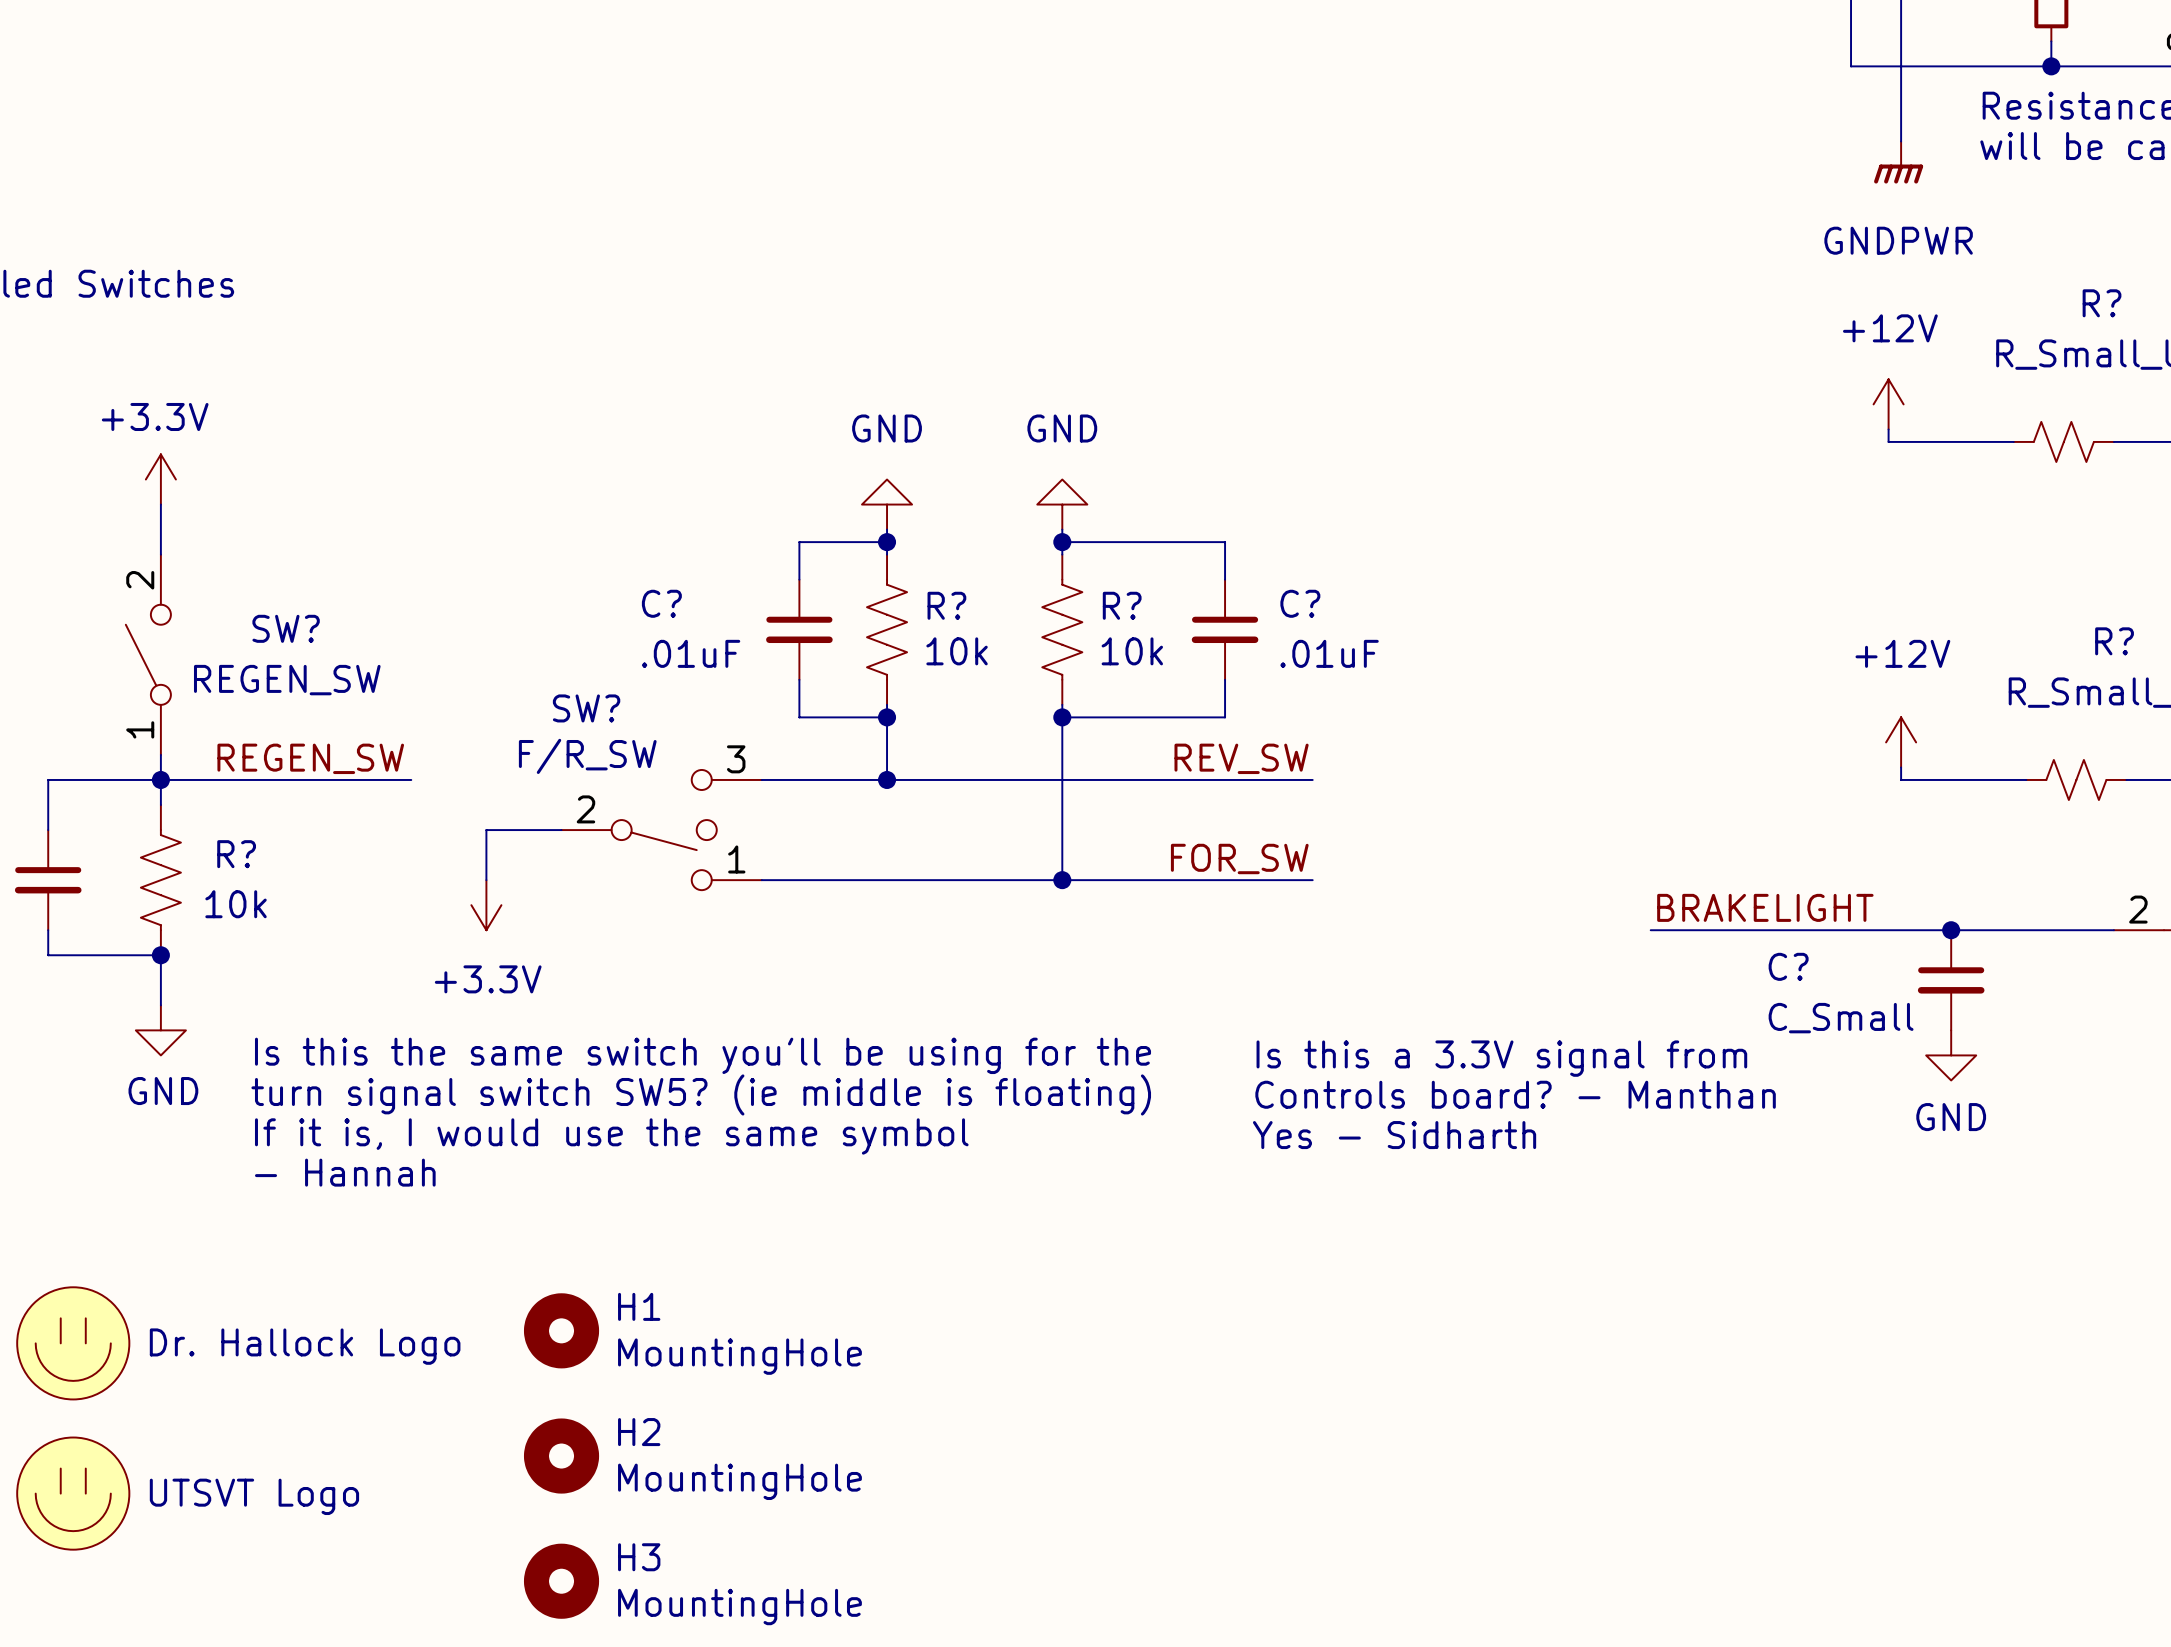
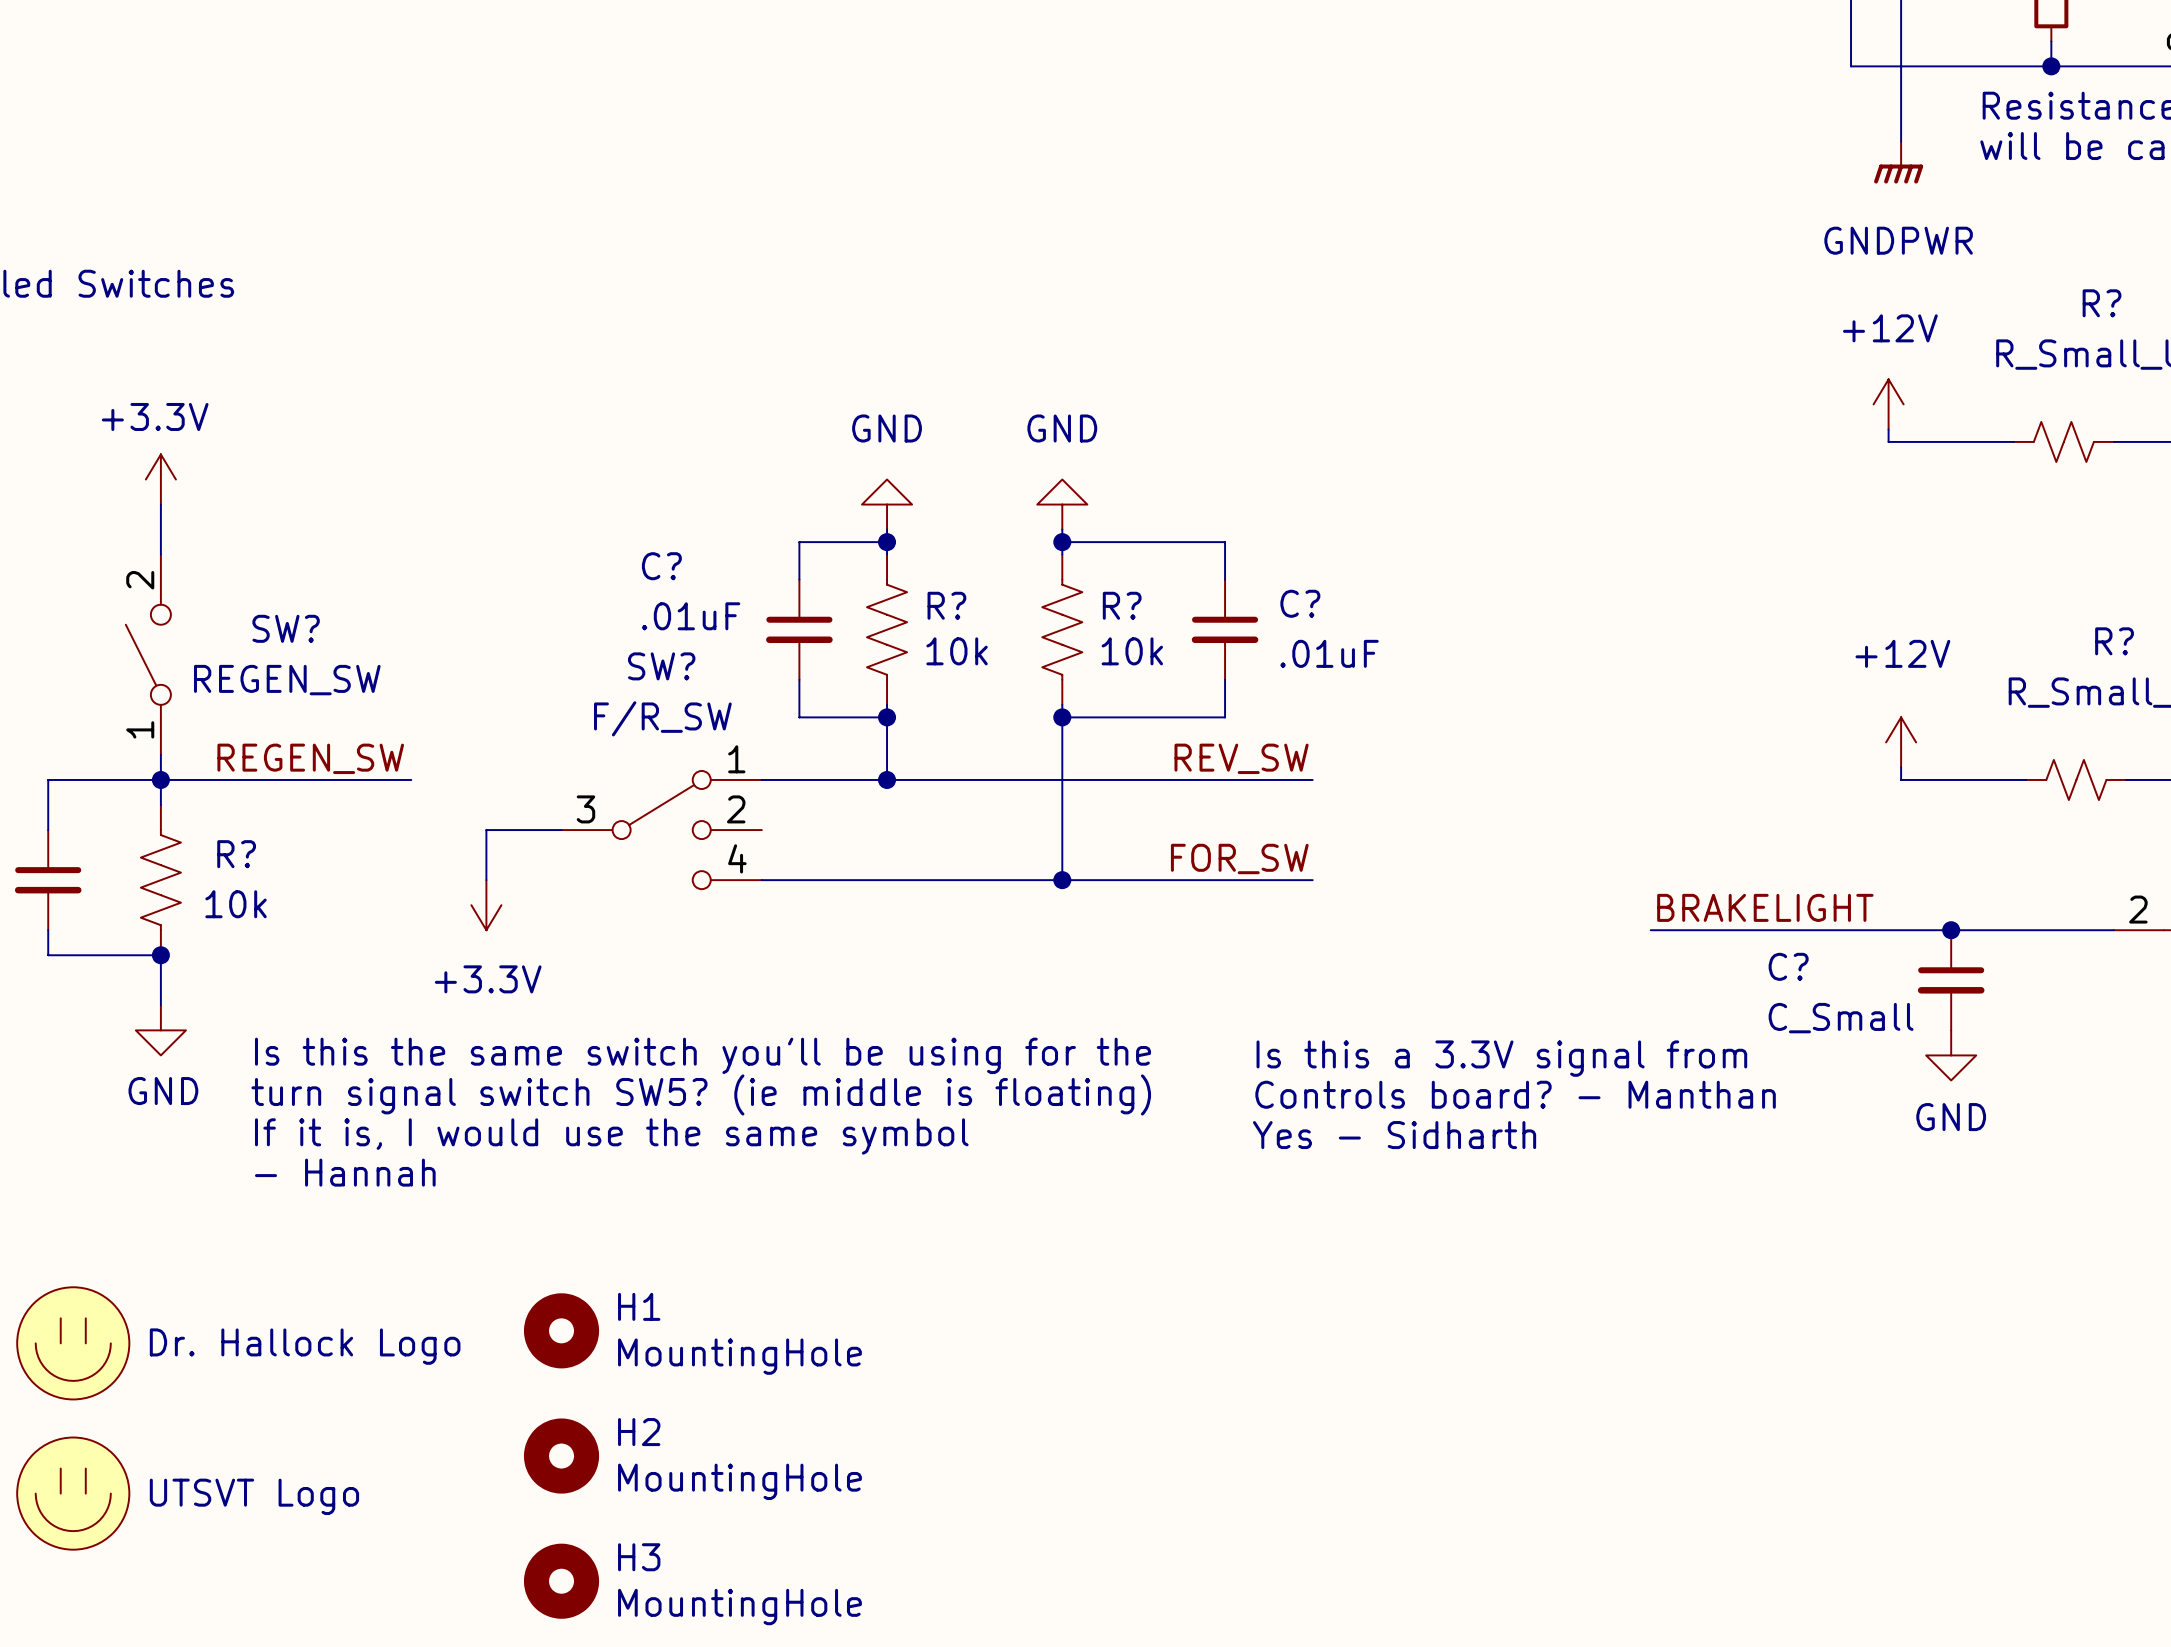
C? name position: C? (661, 603) -> C? (661, 566)
C? value position: .01uF (691, 653) -> .01uF (691, 616)
SW? name position: SW? (586, 708) -> SW? (661, 666)
SW? value position: F/R_SW (587, 756) -> F/R_SW (662, 718)
SW? symbol: [561, 769, 762, 891] -> [561, 770, 762, 890]

